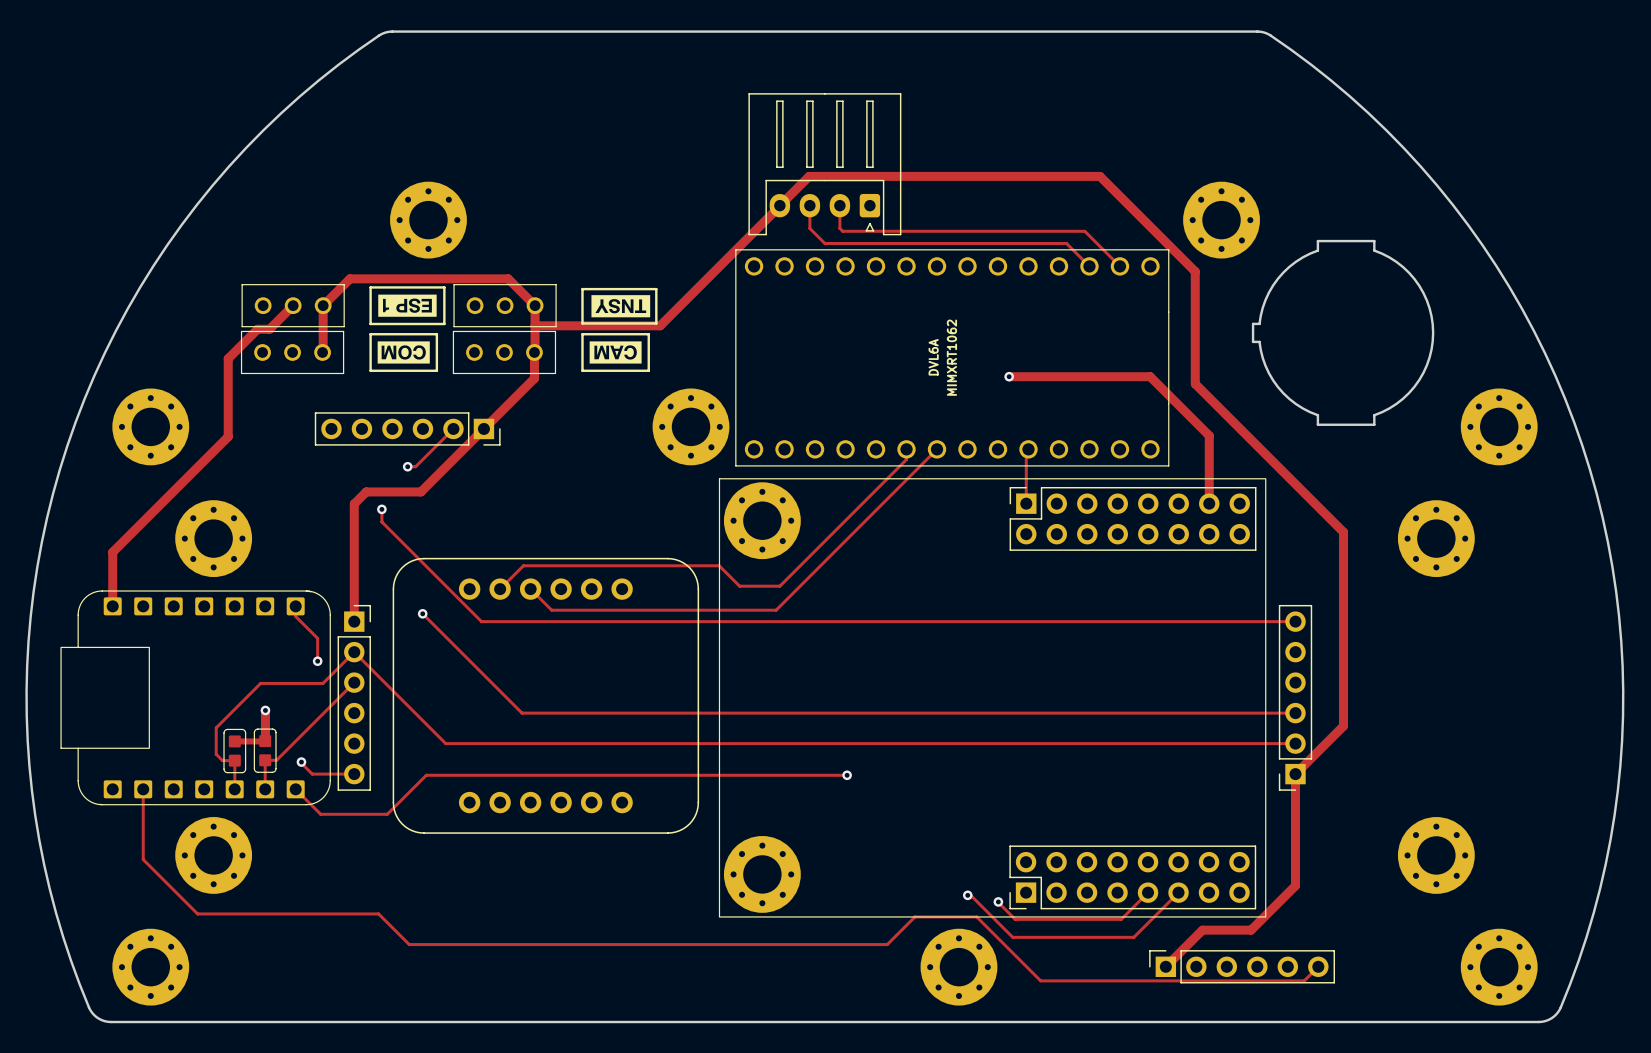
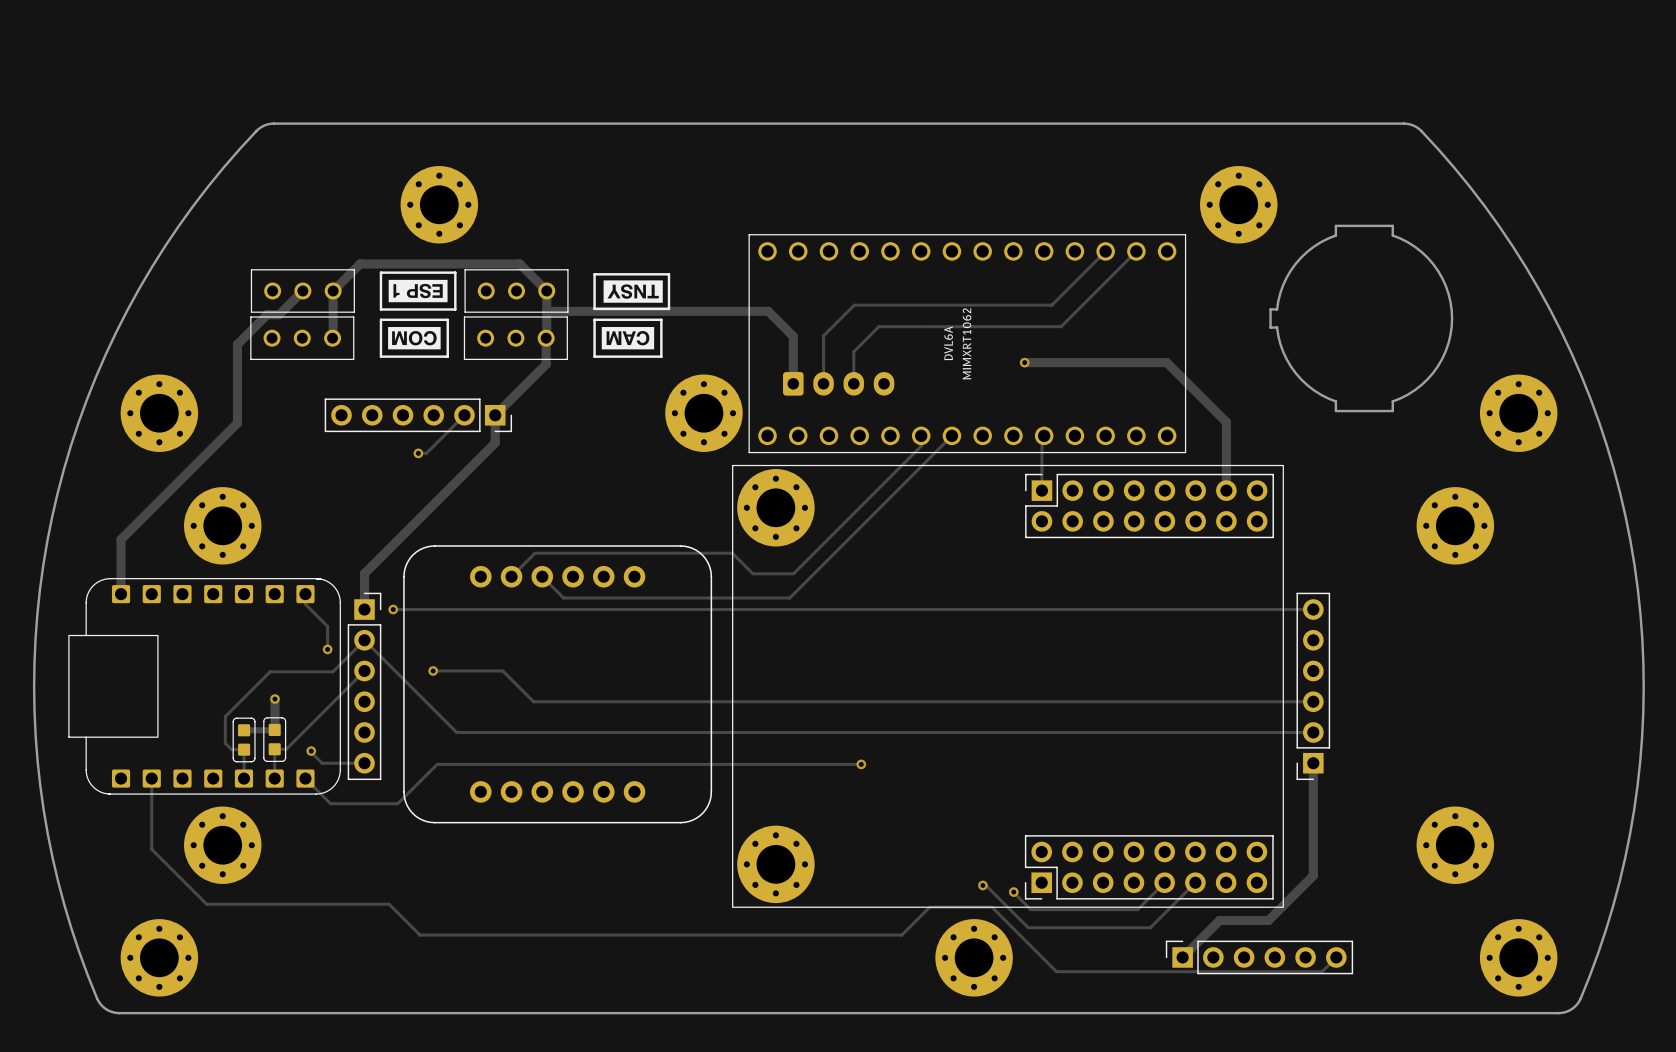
part: (824, 164) -> none
track: (809, 205) (809, 228) (824, 243) (1066, 243) (1089, 266) -> (823, 383) (823, 335) (854, 305) (1051, 305) (1105, 251)
track: (839, 205) (839, 228) (842, 231) (1084, 231) (1119, 266) -> (853, 383) (853, 351) (878, 326) (1061, 326) (1136, 251)
track: (660, 325) (809, 176) (1100, 176) (1195, 271) (1195, 383) (1343, 532) (1343, 726) (1295, 774) -> (672, 311) (768, 311) (793, 336) (793, 383)
part: none -> (838, 383)
track: (483, 428) (420, 491) (366, 491) (354, 503) (354, 586) -> (495, 415) (495, 442) (364, 573)
track: (381, 509) (381, 521) (481, 621) -> (393, 609) (492, 609)
via: (381, 509) -> none
track: (422, 613) (491, 682) -> (433, 670) (502, 670)
via: (422, 613) -> none
via: none -> (393, 609)
via: none -> (433, 670)
board edge: (88, 1007) (63, 937) (44, 864) (35, 815) (27, 740) (27, 666) (33, 591) (47, 517) (59, 469) (84, 398) (115, 330) (140, 287) (181, 224) (228, 166) (281, 113) (318, 80) (358, 49) (380, 34) (392, 31) (1259, 31) (1270, 35) (1330, 80) (1368, 113) (1420, 166) (1468, 224) (1509, 287) (1545, 353) (1565, 398) (1582, 445) (1602, 517) (1612, 566) (1621, 641) (1623, 716) (1620, 765) (1610, 840) (1600, 888) (1578, 960) (1560, 1007) -> (97, 998) (79, 952) (58, 881) (47, 833) (37, 761) (34, 712) (35, 638) (39, 589) (52, 516) (63, 469) (87, 399) (105, 353) (139, 288) (178, 226) (208, 186) (256, 131) (264, 125) (273, 123) (1403, 123) (1417, 127) (1454, 167) (1484, 206) (1525, 267) (1550, 309) (1571, 353) (1599, 422) (1613, 469) (1630, 540) (1637, 589) (1643, 662) (1643, 712) (1637, 785) (1625, 858) (1613, 905) (1580, 998)

